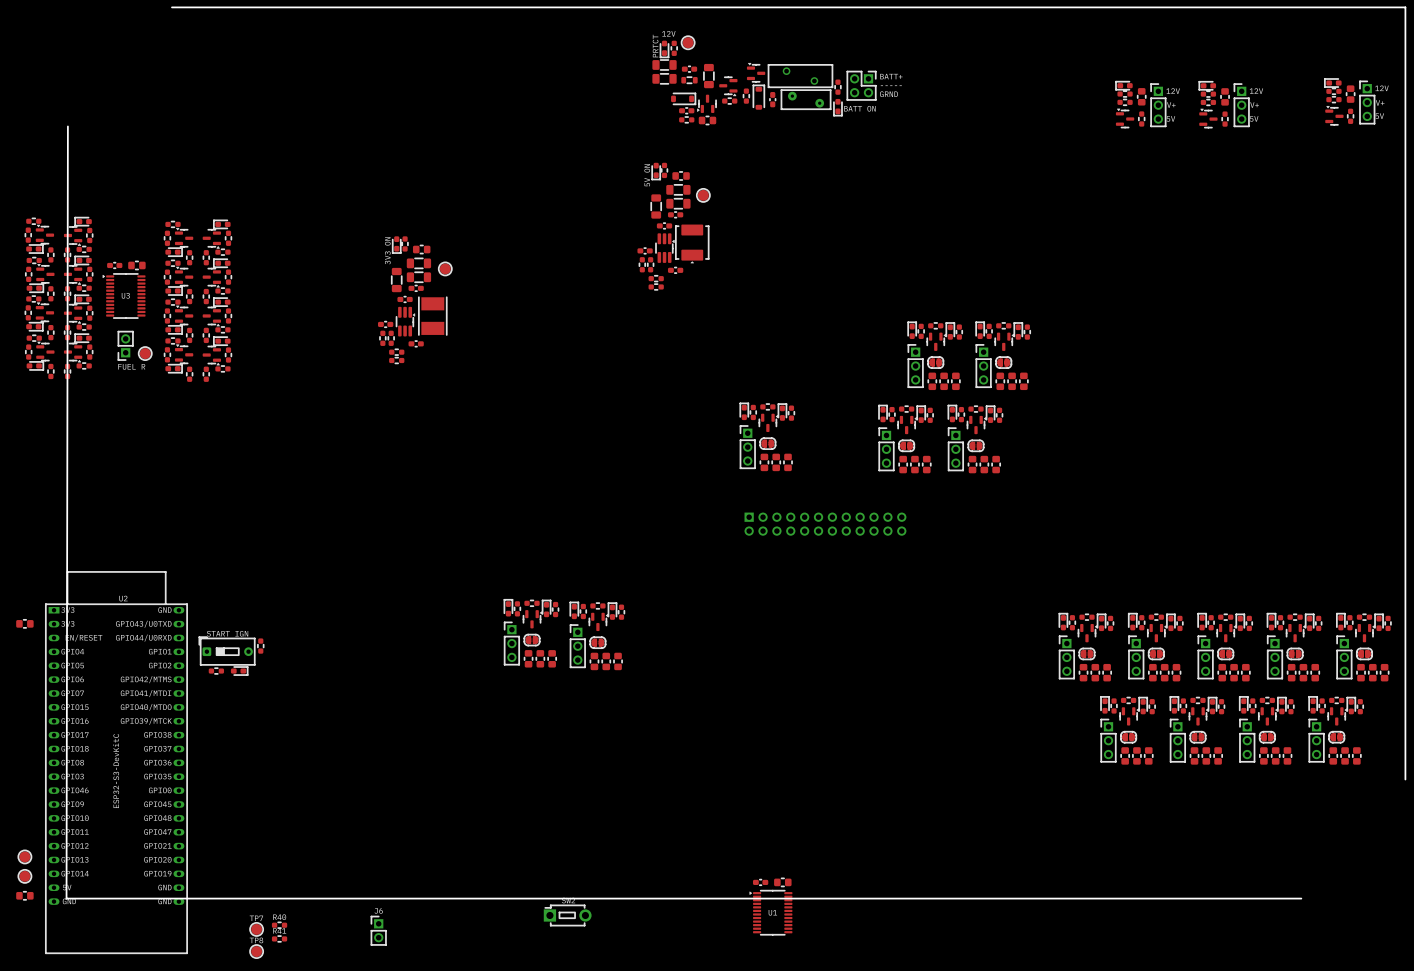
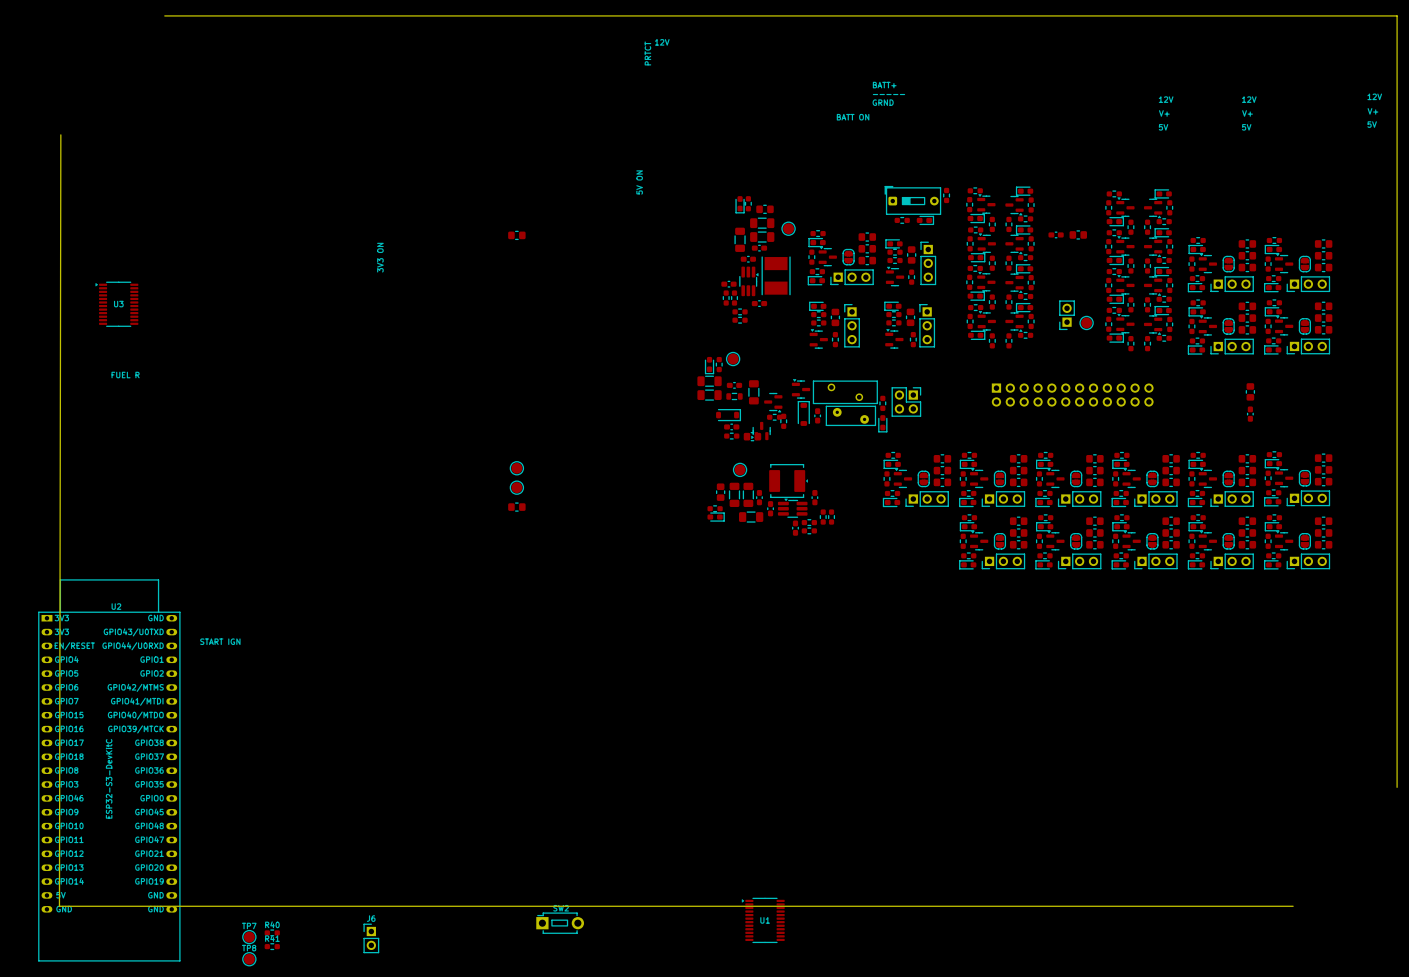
part: (688, 42) -> none
part: (674, 48) -> none
part: (664, 49) -> none
part: (664, 64) -> none
part: (689, 69) -> none
part: (756, 72) -> none
part: (708, 76) -> none
part: (800, 76) -> none
part: (664, 78) -> none
part: (689, 80) -> none
part: (1333, 83) -> none
part: (861, 85) -> none
part: (1124, 85) -> none
part: (1207, 85) -> none
part: (728, 86) -> none
part: (837, 87) -> none
part: (1333, 91) -> none
part: (1125, 94) -> none
part: (1208, 94) -> none
part: (1350, 94) -> none
part: (746, 96) -> none
part: (1141, 96) -> none
part: (1225, 96) -> none
part: (758, 97) -> none
part: (683, 98) -> none
part: (772, 99) -> none
part: (806, 99) -> none
part: (1333, 99) -> none
part: (729, 101) -> none
part: (1125, 102) -> none
part: (1208, 102) -> none
part: (1367, 102) -> none
part: (706, 103) -> none
part: (1158, 105) -> none
part: (1241, 105) -> none
part: (837, 107) -> none
part: (686, 110) -> none
part: (1334, 115) -> none
part: (1350, 116) -> none
part: (1125, 118) -> none
part: (1208, 118) -> none
part: (686, 119) -> none
part: (1141, 119) -> none
part: (1225, 119) -> none
part: (707, 120) -> none
part: (664, 170) -> none
part: (656, 171) -> none
part: (681, 175) -> none
part: none -> (975, 190)
part: none -> (1024, 191)
part: none -> (1114, 193)
part: none -> (1163, 193)
part: none -> (946, 195)
part: (678, 189) -> none
part: none -> (912, 200)
part: (703, 195) -> none
part: none -> (748, 203)
part: none -> (986, 203)
part: none -> (740, 204)
part: none -> (969, 204)
part: none -> (1031, 205)
part: none -> (1014, 205)
part: none -> (1125, 207)
part: none -> (1108, 207)
part: none -> (1169, 207)
part: none -> (765, 209)
part: none -> (1153, 208)
part: (678, 203) -> none
part: (656, 206) -> none
part: none -> (976, 218)
part: none -> (1025, 218)
part: none -> (902, 220)
part: none -> (925, 220)
part: none -> (1115, 221)
part: none -> (1164, 221)
part: (675, 214) -> none
part: none -> (762, 223)
part: none -> (992, 224)
part: none -> (1008, 224)
part: none -> (1130, 227)
part: none -> (1147, 227)
part: none -> (788, 228)
part: (33, 221) -> none
part: (83, 221) -> none
part: none -> (975, 229)
part: none -> (1024, 229)
part: (173, 224) -> none
part: (222, 224) -> none
part: none -> (1114, 232)
part: none -> (1163, 232)
part: (664, 225) -> none
part: none -> (818, 233)
part: none -> (1056, 234)
part: none -> (1078, 234)
part: none -> (516, 235)
part: none -> (762, 237)
part: none -> (867, 237)
part: none -> (740, 239)
part: none -> (1198, 240)
part: none -> (1274, 240)
part: (44, 234) -> none
part: none -> (817, 242)
part: none -> (986, 243)
part: (28, 235) -> none
part: (89, 235) -> none
part: none -> (894, 243)
part: none -> (970, 243)
part: none -> (1031, 243)
part: none -> (1247, 243)
part: none -> (1323, 243)
part: (73, 236) -> none
part: none -> (1014, 244)
part: (184, 237) -> none
part: none -> (1125, 245)
part: (167, 238) -> none
part: (228, 238) -> none
part: none -> (1108, 246)
part: none -> (1169, 246)
part: (211, 239) -> none
part: none -> (759, 248)
part: none -> (1153, 247)
part: none -> (867, 248)
part: none -> (1197, 249)
part: none -> (1273, 249)
part: (405, 243) -> none
part: (692, 243) -> none
part: none -> (895, 252)
part: (396, 244) -> none
part: none -> (911, 254)
part: none -> (1247, 255)
part: none -> (1323, 255)
part position: (665, 248) -> (748, 281)
part: none -> (811, 257)
part: none -> (827, 256)
part: none -> (848, 257)
part: (34, 249) -> none
part: (84, 249) -> none
part: (421, 249) -> none
part: none -> (976, 257)
part: none -> (1025, 257)
part: (645, 250) -> none
part: none -> (748, 259)
part: (173, 252) -> none
part: (222, 252) -> none
part: none -> (867, 260)
part: none -> (895, 260)
part: none -> (1115, 260)
part: none -> (1164, 260)
part: (50, 254) -> none
part: (67, 254) -> none
part: none -> (992, 263)
part: none -> (1008, 263)
part: none -> (1207, 263)
part: none -> (1284, 263)
part: none -> (928, 263)
part: none -> (1191, 264)
part: none -> (1228, 264)
part: none -> (1268, 264)
part: none -> (1304, 264)
part: (189, 257) -> none
part: (206, 257) -> none
part: none -> (1130, 266)
part: none -> (1147, 266)
part: none -> (1247, 267)
part: none -> (1323, 267)
part: (34, 260) -> none
part: (83, 260) -> none
part: none -> (975, 268)
part: none -> (1024, 268)
part: (173, 263) -> none
part: (222, 263) -> none
part: (418, 263) -> none
part: none -> (817, 271)
part: none -> (1114, 271)
part: none -> (1163, 271)
part: (642, 264) -> none
part: (650, 264) -> none
part: (114, 265) -> none
part: (136, 265) -> none
part: none -> (776, 275)
part: (445, 268) -> none
part: none -> (852, 277)
part: none -> (895, 276)
part: none -> (911, 277)
part: (675, 270) -> none
part: none -> (1197, 278)
part: none -> (1273, 278)
part: none -> (816, 280)
part: (45, 273) -> none
part: none -> (969, 282)
part: none -> (986, 281)
part: (28, 274) -> none
part: (89, 274) -> none
part: none -> (1031, 282)
part: (73, 275) -> none
part: none -> (728, 284)
part: none -> (1014, 283)
part: none -> (1232, 284)
part: none -> (1308, 284)
part: (184, 276) -> none
part: none -> (1125, 284)
part: (167, 277) -> none
part: (211, 277) -> none
part: (228, 277) -> none
part: (418, 277) -> none
part: none -> (1108, 285)
part: none -> (1153, 286)
part: none -> (1169, 285)
part: (656, 278) -> none
part: none -> (1196, 287)
part: none -> (1272, 287)
part: (396, 280) -> none
part: (656, 286) -> none
part: none -> (976, 296)
part: (35, 288) -> none
part: (84, 288) -> none
part: (416, 288) -> none
part: none -> (1025, 296)
part: none -> (726, 298)
part: none -> (734, 298)
part: (173, 291) -> none
part: (222, 291) -> none
part: none -> (1115, 299)
part: none -> (1164, 299)
part: (50, 293) -> none
part: (67, 293) -> none
part: none -> (992, 302)
part: none -> (1008, 302)
part: none -> (1198, 302)
part: none -> (1274, 302)
part: none -> (759, 303)
part: (189, 296) -> none
part: (206, 296) -> none
part: none -> (1130, 304)
part: none -> (1147, 304)
part: none -> (893, 306)
part: none -> (1323, 306)
part: (33, 298) -> none
part: none -> (817, 306)
part: none -> (1247, 306)
part: (83, 299) -> none
part: (405, 299) -> none
part: none -> (975, 307)
part: none -> (1024, 307)
part: (173, 302) -> none
part: (222, 302) -> none
part: none -> (1114, 310)
part: none -> (1163, 310)
part: none -> (740, 311)
part: none -> (1197, 311)
part: none -> (1273, 311)
part: none -> (818, 314)
part: none -> (893, 314)
part: none -> (1067, 315)
part: none -> (835, 317)
part: none -> (910, 317)
part: none -> (1247, 318)
part: none -> (1323, 318)
part: none -> (740, 320)
part: (28, 312) -> none
part: (44, 312) -> none
part: none -> (986, 320)
part: (73, 313) -> none
part: (89, 313) -> none
part: none -> (970, 321)
part: none -> (1014, 322)
part: none -> (1031, 321)
part: none -> (818, 322)
part: none -> (893, 322)
part: none -> (1086, 322)
part: (167, 315) -> none
part: (184, 315) -> none
part: (228, 315) -> none
part: none -> (1108, 324)
part: none -> (1125, 323)
part: (211, 316) -> none
part: (432, 316) -> none
part: none -> (1153, 325)
part: none -> (1169, 324)
part: none -> (852, 325)
part: none -> (927, 325)
part: none -> (1207, 325)
part: none -> (1284, 325)
part: none -> (1191, 326)
part: none -> (1228, 326)
part: none -> (1268, 326)
part: none -> (1304, 326)
part: (405, 321) -> none
part: none -> (1247, 329)
part: none -> (1323, 329)
part footprint: [1013, 322, 1023, 340] -> [1005, 333, 1013, 349]
part: (385, 324) -> none
part: (935, 325) -> none
part: (1003, 325) -> none
part: (34, 326) -> none
part: (84, 327) -> none
part: (173, 329) -> none
part: (222, 329) -> none
part: none -> (1115, 338)
part: none -> (818, 338)
part: none -> (894, 338)
part: (912, 330) -> none
part rotation: 0° (980, 330) -> 90° clockwise (976, 335)
part: none -> (1164, 338)
part: none -> (835, 339)
part: (950, 331) -> none
part: (989, 331) -> none
part: (50, 332) -> none
part: (67, 332) -> none
part: (959, 332) -> none
part: none -> (992, 340)
part rotation: 0° (1027, 332) -> 90° clockwise (1025, 335)
part: none -> (1197, 341)
part: none -> (1273, 340)
part: (189, 335) -> none
part: (206, 335) -> none
part: none -> (1130, 343)
part: none -> (1147, 343)
part: (34, 338) -> none
part: (83, 338) -> none
part: (382, 338) -> none
part: (391, 338) -> none
part: none -> (1232, 346)
part: none -> (1308, 346)
part: (173, 340) -> none
part: (222, 341) -> none
part: (936, 341) -> none
part: (1004, 341) -> none
part: none -> (1196, 350)
part: none -> (1272, 349)
part: (416, 343) -> none
part: (125, 345) -> none
part: none -> (733, 359)
part: (45, 351) -> none
part: (28, 352) -> none
part: (73, 352) -> none
part: (89, 352) -> none
part: (396, 352) -> none
part: (145, 353) -> none
part: (167, 354) -> none
part: (184, 354) -> none
part: (211, 355) -> none
part: (228, 355) -> none
part: none -> (719, 364)
part: none -> (709, 365)
part: (396, 360) -> none
part: (935, 362) -> none
part: (1003, 362) -> none
part: (35, 365) -> none
part: (84, 365) -> none
part: (915, 366) -> none
part: (983, 366) -> none
part: (173, 368) -> none
part: (222, 368) -> none
part: (50, 371) -> none
part: (67, 371) -> none
part: none -> (709, 381)
part: (189, 374) -> none
part: (206, 374) -> none
part: none -> (734, 385)
part: none -> (801, 388)
part: (932, 381) -> none
part: (944, 381) -> none
part: (955, 381) -> none
part: (1000, 381) -> none
part: (1012, 381) -> none
part: (1023, 381) -> none
part: none -> (1250, 391)
part: none -> (753, 392)
part: none -> (845, 392)
part: none -> (709, 395)
part: none -> (1072, 395)
part: none -> (734, 396)
part: none -> (906, 401)
part: none -> (773, 402)
part: none -> (882, 403)
part footprint: [778, 403, 787, 421] -> [767, 414, 783, 421]
part: none -> (803, 413)
part: none -> (1250, 414)
part: none -> (728, 415)
part: (767, 406) -> none
part footprint: [888, 406, 896, 423] -> [878, 415, 888, 433]
part: none -> (817, 415)
part: none -> (850, 415)
part: (906, 409) -> none
part: (976, 409) -> none
part: (744, 411) -> none
part: (753, 412) -> none
part: (883, 413) -> none
part: (952, 413) -> none
part: (921, 414) -> none
part: (961, 414) -> none
part: (990, 414) -> none
part: (930, 415) -> none
part: (999, 415) -> none
part: none -> (731, 426)
part rotation: 0° (768, 422) -> 180° (760, 431)
part: (907, 425) -> none
part: (976, 425) -> none
part: none -> (731, 436)
part: none -> (752, 436)
part footprint: [968, 440, 984, 452] -> [961, 452, 978, 459]
part: (767, 443) -> none
part rotation: 0° (906, 445) -> 90° clockwise (923, 478)
part position: (906, 445) -> (923, 478)
part: none -> (1274, 454)
part: (747, 447) -> none
part: none -> (893, 455)
part: none -> (1045, 455)
part: none -> (1121, 455)
part: none -> (1198, 455)
part: (886, 449) -> none
part: (955, 449) -> none
part: none -> (1323, 458)
part: none -> (942, 458)
part: none -> (1018, 458)
part: none -> (1094, 458)
part: none -> (1171, 458)
part: none -> (1247, 458)
part: none -> (1273, 463)
part: none -> (892, 464)
part: none -> (968, 464)
part: none -> (1044, 464)
part: none -> (1121, 464)
part: none -> (1197, 464)
part: none -> (516, 468)
part: none -> (740, 469)
part: none -> (1323, 469)
part: (764, 462) -> none
part: (776, 462) -> none
part: (788, 462) -> none
part: none -> (942, 470)
part: none -> (1018, 470)
part: none -> (1094, 470)
part: none -> (1171, 470)
part: none -> (1247, 470)
part: (903, 464) -> none
part: (914, 464) -> none
part: (926, 464) -> none
part: (972, 464) -> none
part: (984, 464) -> none
part: (996, 464) -> none
part: none -> (1284, 477)
part: none -> (886, 478)
part: none -> (902, 478)
part: none -> (963, 478)
part: none -> (979, 478)
part: none -> (999, 478)
part: none -> (1039, 478)
part: none -> (1055, 478)
part: none -> (1076, 478)
part: none -> (1115, 478)
part: none -> (1131, 478)
part: none -> (1152, 478)
part: none -> (1191, 478)
part: none -> (1207, 478)
part: none -> (1228, 478)
part: none -> (1268, 478)
part: none -> (1304, 478)
part: none -> (788, 481)
part: none -> (1323, 481)
part: none -> (942, 482)
part: none -> (1018, 482)
part: none -> (1094, 482)
part: none -> (1171, 482)
part: none -> (1247, 482)
part: none -> (516, 487)
part: none -> (720, 492)
part: none -> (1273, 492)
part: none -> (892, 493)
part: none -> (968, 493)
part: none -> (1045, 493)
part: none -> (1121, 493)
part: none -> (1197, 493)
part: none -> (734, 494)
part: none -> (748, 494)
part: none -> (759, 497)
part: none -> (814, 497)
part: none -> (927, 499)
part: none -> (1003, 499)
part: none -> (1079, 499)
part: none -> (1155, 499)
part: none -> (1232, 499)
part: none -> (1308, 498)
part: none -> (1272, 501)
part: none -> (891, 502)
part: none -> (967, 502)
part: none -> (1044, 502)
part: none -> (1120, 502)
part: none -> (1196, 502)
part: none -> (516, 507)
part: none -> (715, 508)
part: none -> (770, 508)
part: none -> (792, 508)
part: none -> (715, 517)
part: none -> (751, 517)
part: none -> (823, 517)
part: none -> (831, 517)
part: none -> (969, 517)
part: none -> (1045, 517)
part: none -> (1121, 517)
part: none -> (1198, 517)
part: none -> (1274, 517)
part: none -> (1018, 521)
part: none -> (1094, 521)
part: none -> (1171, 521)
part: none -> (1247, 521)
part: none -> (1323, 521)
part: none -> (809, 522)
part: none -> (968, 526)
part: none -> (1044, 526)
part: none -> (1121, 526)
part: none -> (1197, 526)
part: none -> (1273, 526)
part: none -> (795, 528)
part: none -> (809, 530)
part: (825, 524) -> none
part: none -> (1018, 532)
part: none -> (1094, 532)
part: none -> (1171, 532)
part: none -> (1247, 532)
part: none -> (1323, 532)
part: none -> (979, 540)
part: none -> (1055, 540)
part: none -> (1131, 540)
part: none -> (1207, 540)
part: none -> (1284, 540)
part: none -> (963, 541)
part: none -> (999, 541)
part: none -> (1039, 541)
part: none -> (1076, 541)
part: none -> (1115, 541)
part: none -> (1152, 541)
part: none -> (1191, 541)
part: none -> (1228, 541)
part: none -> (1268, 541)
part: none -> (1304, 541)
part: none -> (1018, 544)
part: none -> (1094, 544)
part: none -> (1171, 544)
part: none -> (1247, 544)
part: none -> (1323, 544)
part: none -> (968, 555)
part: none -> (1045, 555)
part: none -> (1121, 555)
part: none -> (1197, 555)
part: none -> (1273, 555)
part: none -> (1003, 561)
part: none -> (1079, 561)
part: none -> (1155, 561)
part: none -> (1232, 561)
part: none -> (1308, 561)
part: none -> (967, 564)
part: none -> (1044, 564)
part: none -> (1120, 564)
part: none -> (1196, 564)
part: none -> (1272, 564)
part: (532, 603) -> none
part: (597, 605) -> none
part: (508, 607) -> none
part: (517, 608) -> none
part: (546, 608) -> none
part: (555, 609) -> none
part: (574, 610) -> none
part: (583, 611) -> none
part: (612, 611) -> none
part: (621, 612) -> none
part: (1086, 617) -> none
part: (1156, 617) -> none
part: (1225, 617) -> none
part: (1295, 617) -> none
part: (1364, 617) -> none
part: (532, 619) -> none
part: (598, 621) -> none
part: (1063, 621) -> none
part: (1132, 621) -> none
part: (1202, 621) -> none
part: (1271, 621) -> none
part: (1340, 621) -> none
part: (1072, 622) -> none
part: (1101, 622) -> none
part: (1141, 622) -> none
part: (1170, 622) -> none
part: (1211, 622) -> none
part: (1240, 622) -> none
part: (1280, 622) -> none
part: (1309, 622) -> none
part: (1349, 622) -> none
part: (1379, 622) -> none
part: (24, 623) -> none
part: (1110, 623) -> none
part: (1179, 623) -> none
part: (1249, 623) -> none
part: (1318, 623) -> none
part: (1388, 623) -> none
part: (1087, 633) -> none
part: (1157, 633) -> none
part: (1226, 633) -> none
part: (1295, 633) -> none
part: (1365, 633) -> none
part: (532, 640) -> none
part: (597, 642) -> none
part: (511, 643) -> none
part: (260, 646) -> none
part: (577, 646) -> none
part: (227, 651) -> none
part: (1086, 653) -> none
part: (1156, 653) -> none
part: (1225, 653) -> none
part: (1295, 653) -> none
part: (1364, 653) -> none
part: (1066, 657) -> none
part: (1136, 657) -> none
part: (1205, 657) -> none
part: (1274, 657) -> none
part: (1344, 657) -> none
part: (528, 658) -> none
part: (540, 658) -> none
part: (552, 658) -> none
part: (594, 661) -> none
part: (606, 661) -> none
part: (618, 661) -> none
part: (216, 671) -> none
part: (239, 671) -> none
part: (1083, 672) -> none
part: (1095, 672) -> none
part: (1107, 672) -> none
part: (1152, 672) -> none
part: (1164, 672) -> none
part: (1176, 672) -> none
part: (1222, 672) -> none
part: (1234, 672) -> none
part: (1245, 672) -> none
part: (1291, 672) -> none
part: (1303, 672) -> none
part: (1315, 672) -> none
part: (1361, 672) -> none
part: (1372, 672) -> none
part: (1384, 672) -> none
part: (1128, 700) -> none
part: (1197, 700) -> none
part: (1267, 700) -> none
part: (1336, 700) -> none
part: (1105, 705) -> none
part: (1114, 705) -> none
part: (1143, 705) -> none
part: (1174, 705) -> none
part: (1183, 705) -> none
part: (1212, 705) -> none
part: (1243, 705) -> none
part: (1252, 705) -> none
part: (1281, 705) -> none
part: (1313, 705) -> none
part: (1322, 705) -> none
part: (1351, 705) -> none
part: (1152, 706) -> none
part: (1221, 706) -> none
part: (1290, 706) -> none
part: (1360, 706) -> none
part: (1129, 716) -> none
part: (1198, 716) -> none
part: (1268, 716) -> none
part: (1337, 716) -> none
part: (1128, 737) -> none
part: (1197, 737) -> none
part: (1267, 737) -> none
part: (1336, 737) -> none
part: (1108, 740) -> none
part: (1177, 740) -> none
part: (1247, 740) -> none
part: (1316, 740) -> none
part: (1125, 755) -> none
part: (1136, 755) -> none
part: (1148, 755) -> none
part: (1194, 755) -> none
part: (1206, 755) -> none
part: (1218, 755) -> none
part: (1263, 755) -> none
part: (1275, 755) -> none
part: (1287, 755) -> none
part: (1333, 755) -> none
part: (1345, 755) -> none
part: (1356, 755) -> none
part: (24, 856) -> none
part: (24, 876) -> none
part: (760, 882) -> none
part: (782, 882) -> none
part: (24, 895) -> none

